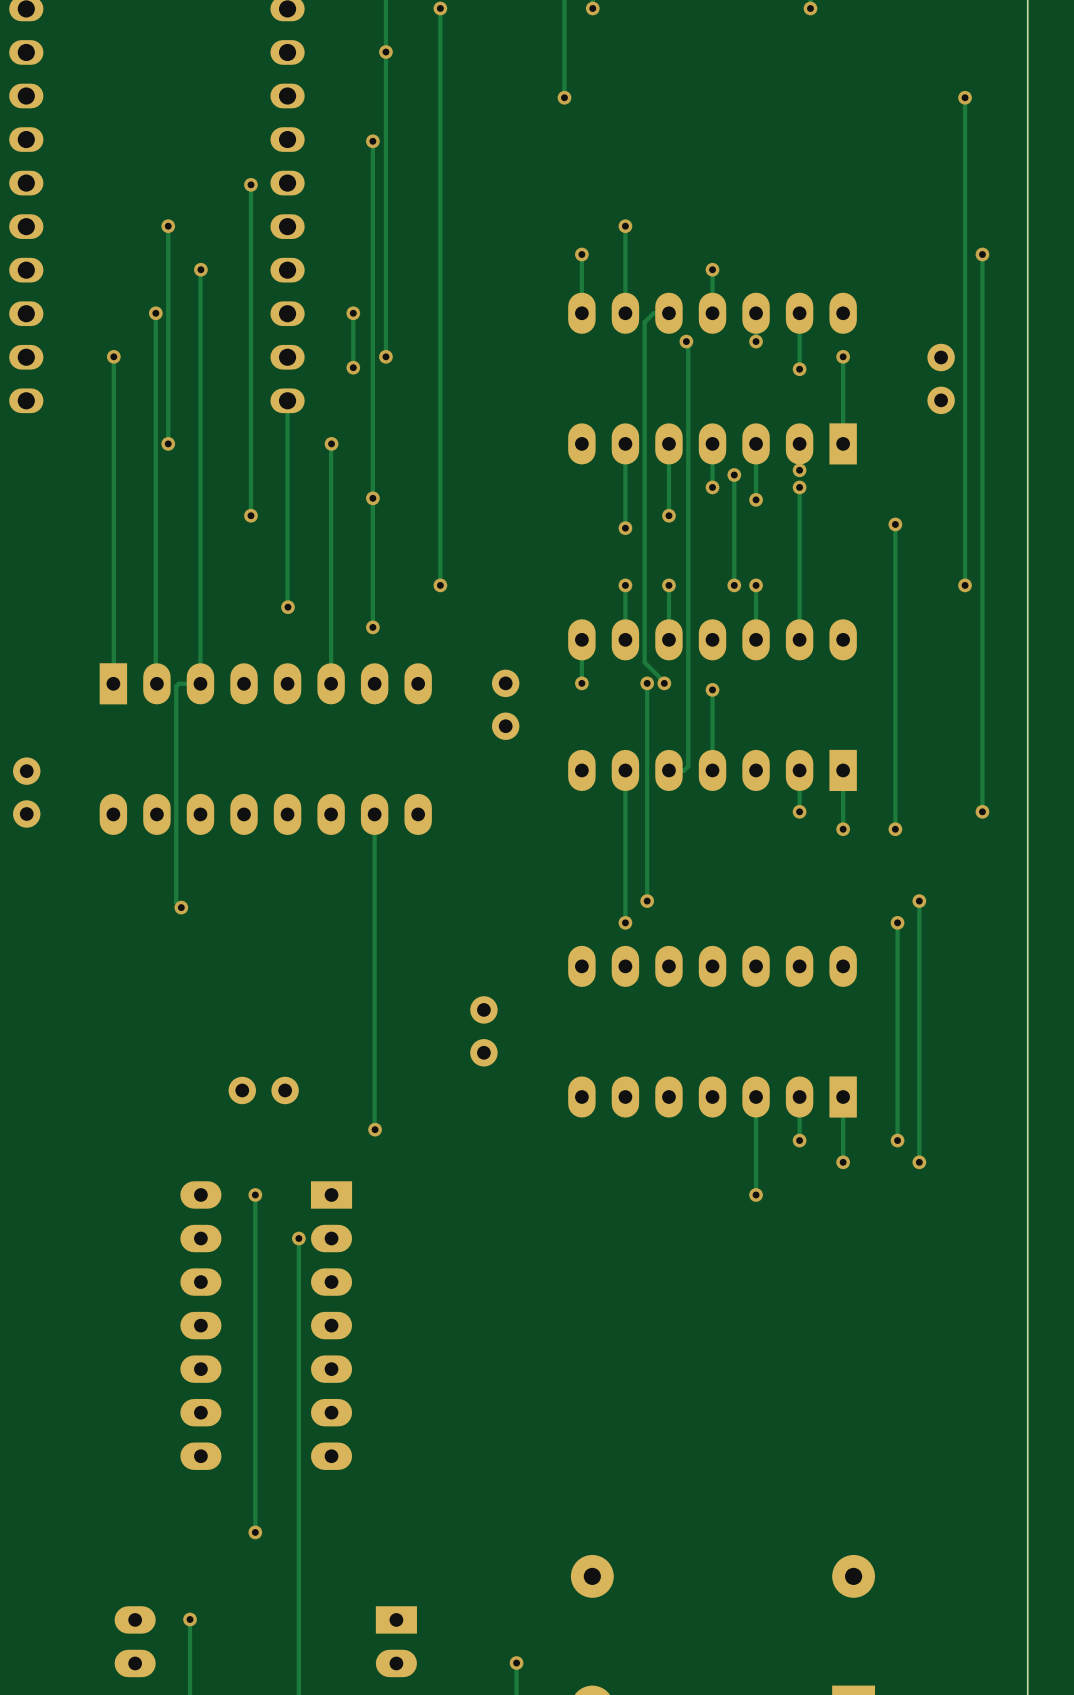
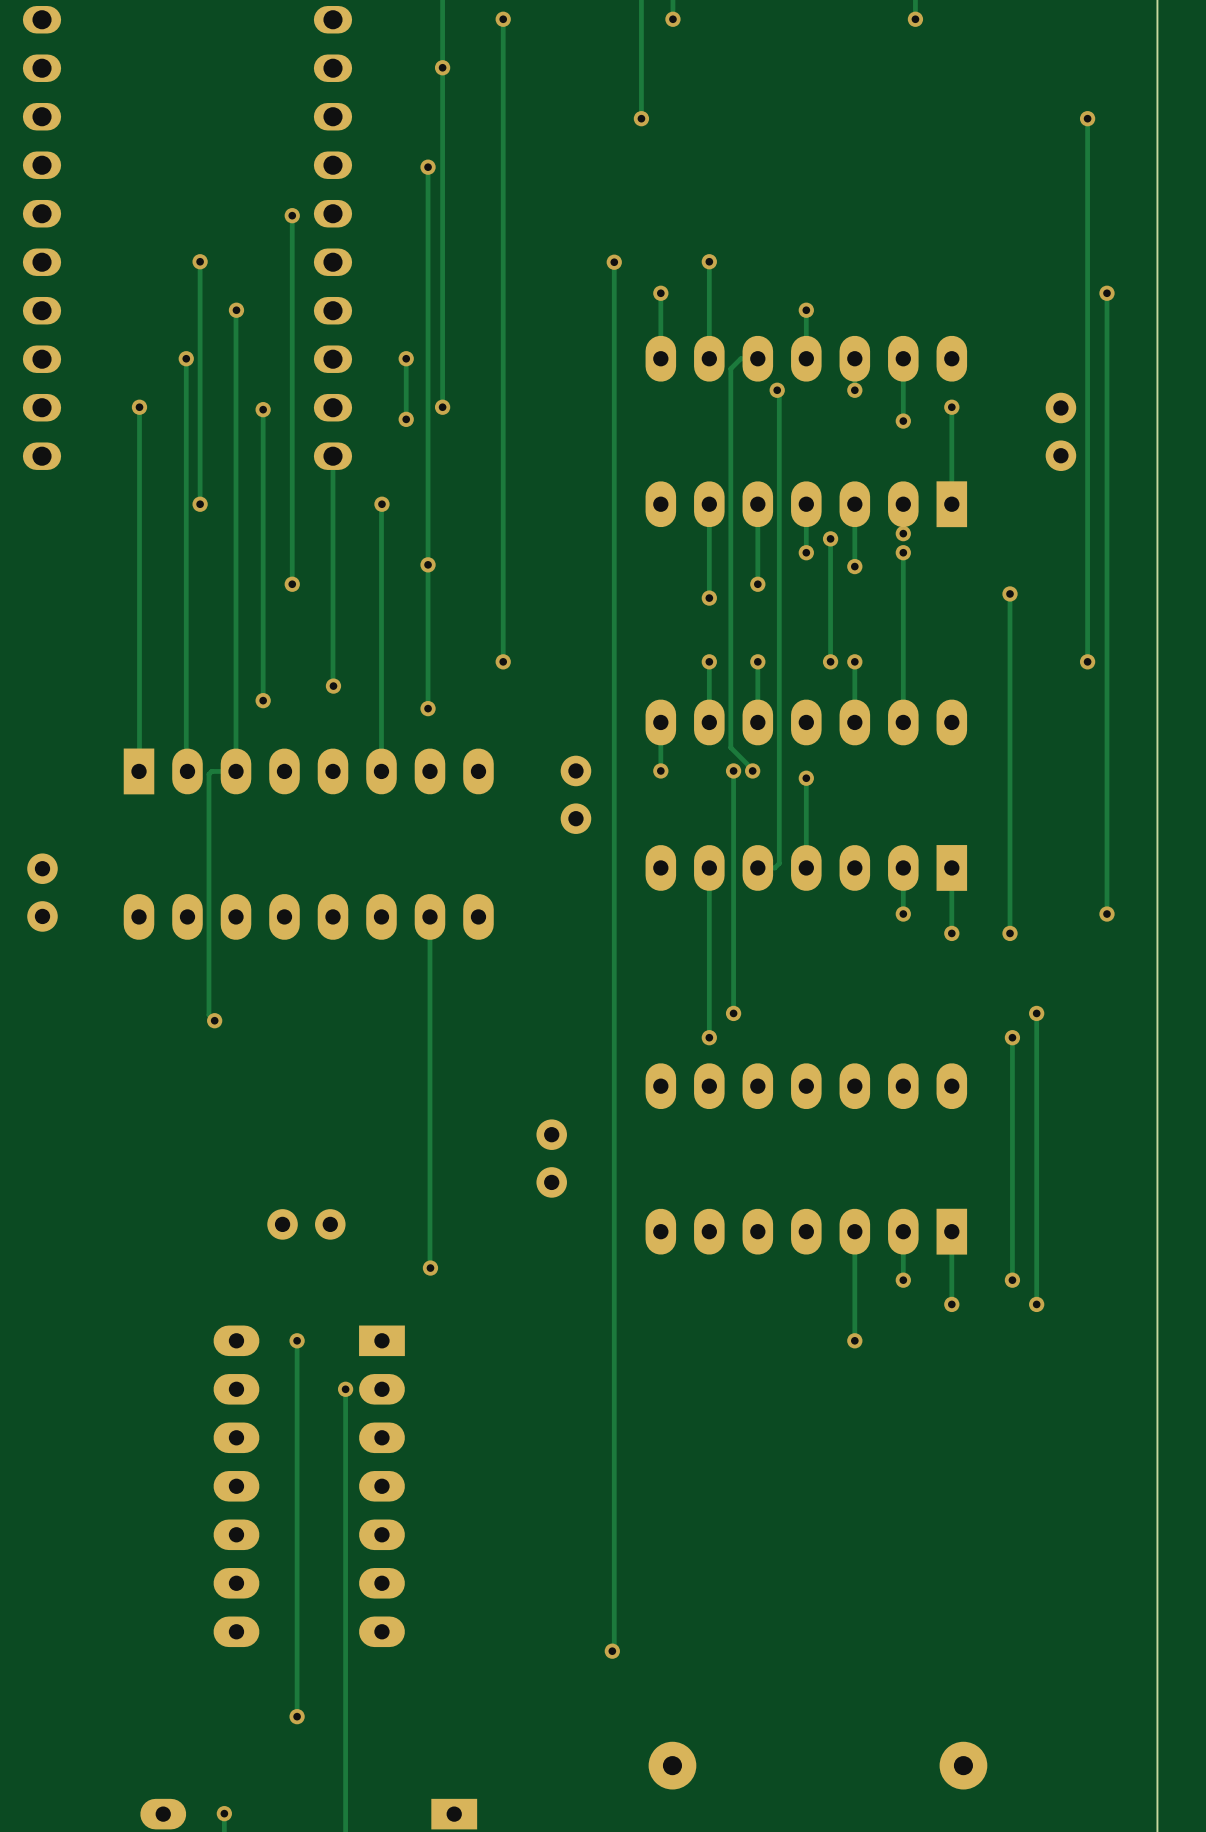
track: none -> (614, 262) (614, 1649) (612, 1651)
via: none -> (614, 262)
track: none -> (263, 409) (263, 700)
via: none -> (263, 409)
via: none -> (263, 700)
via: none -> (612, 1651)

